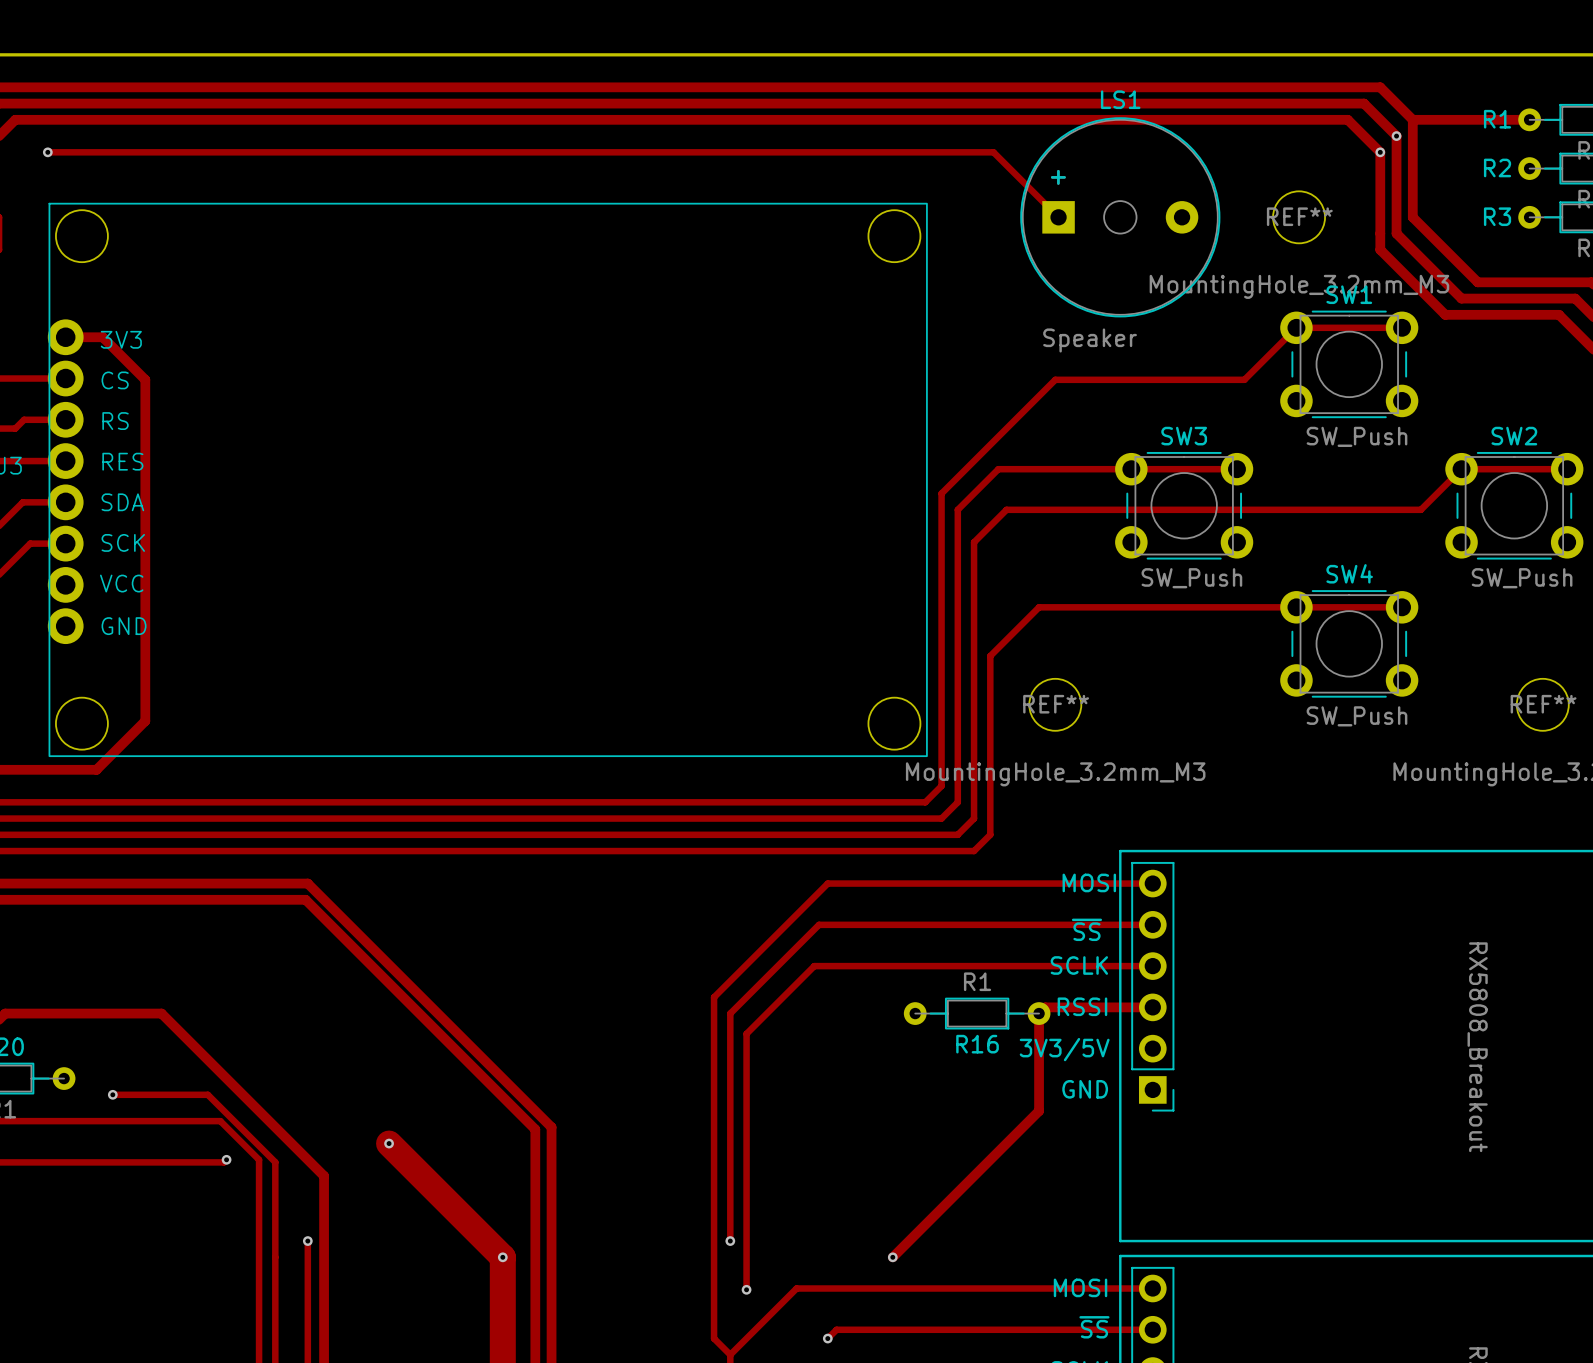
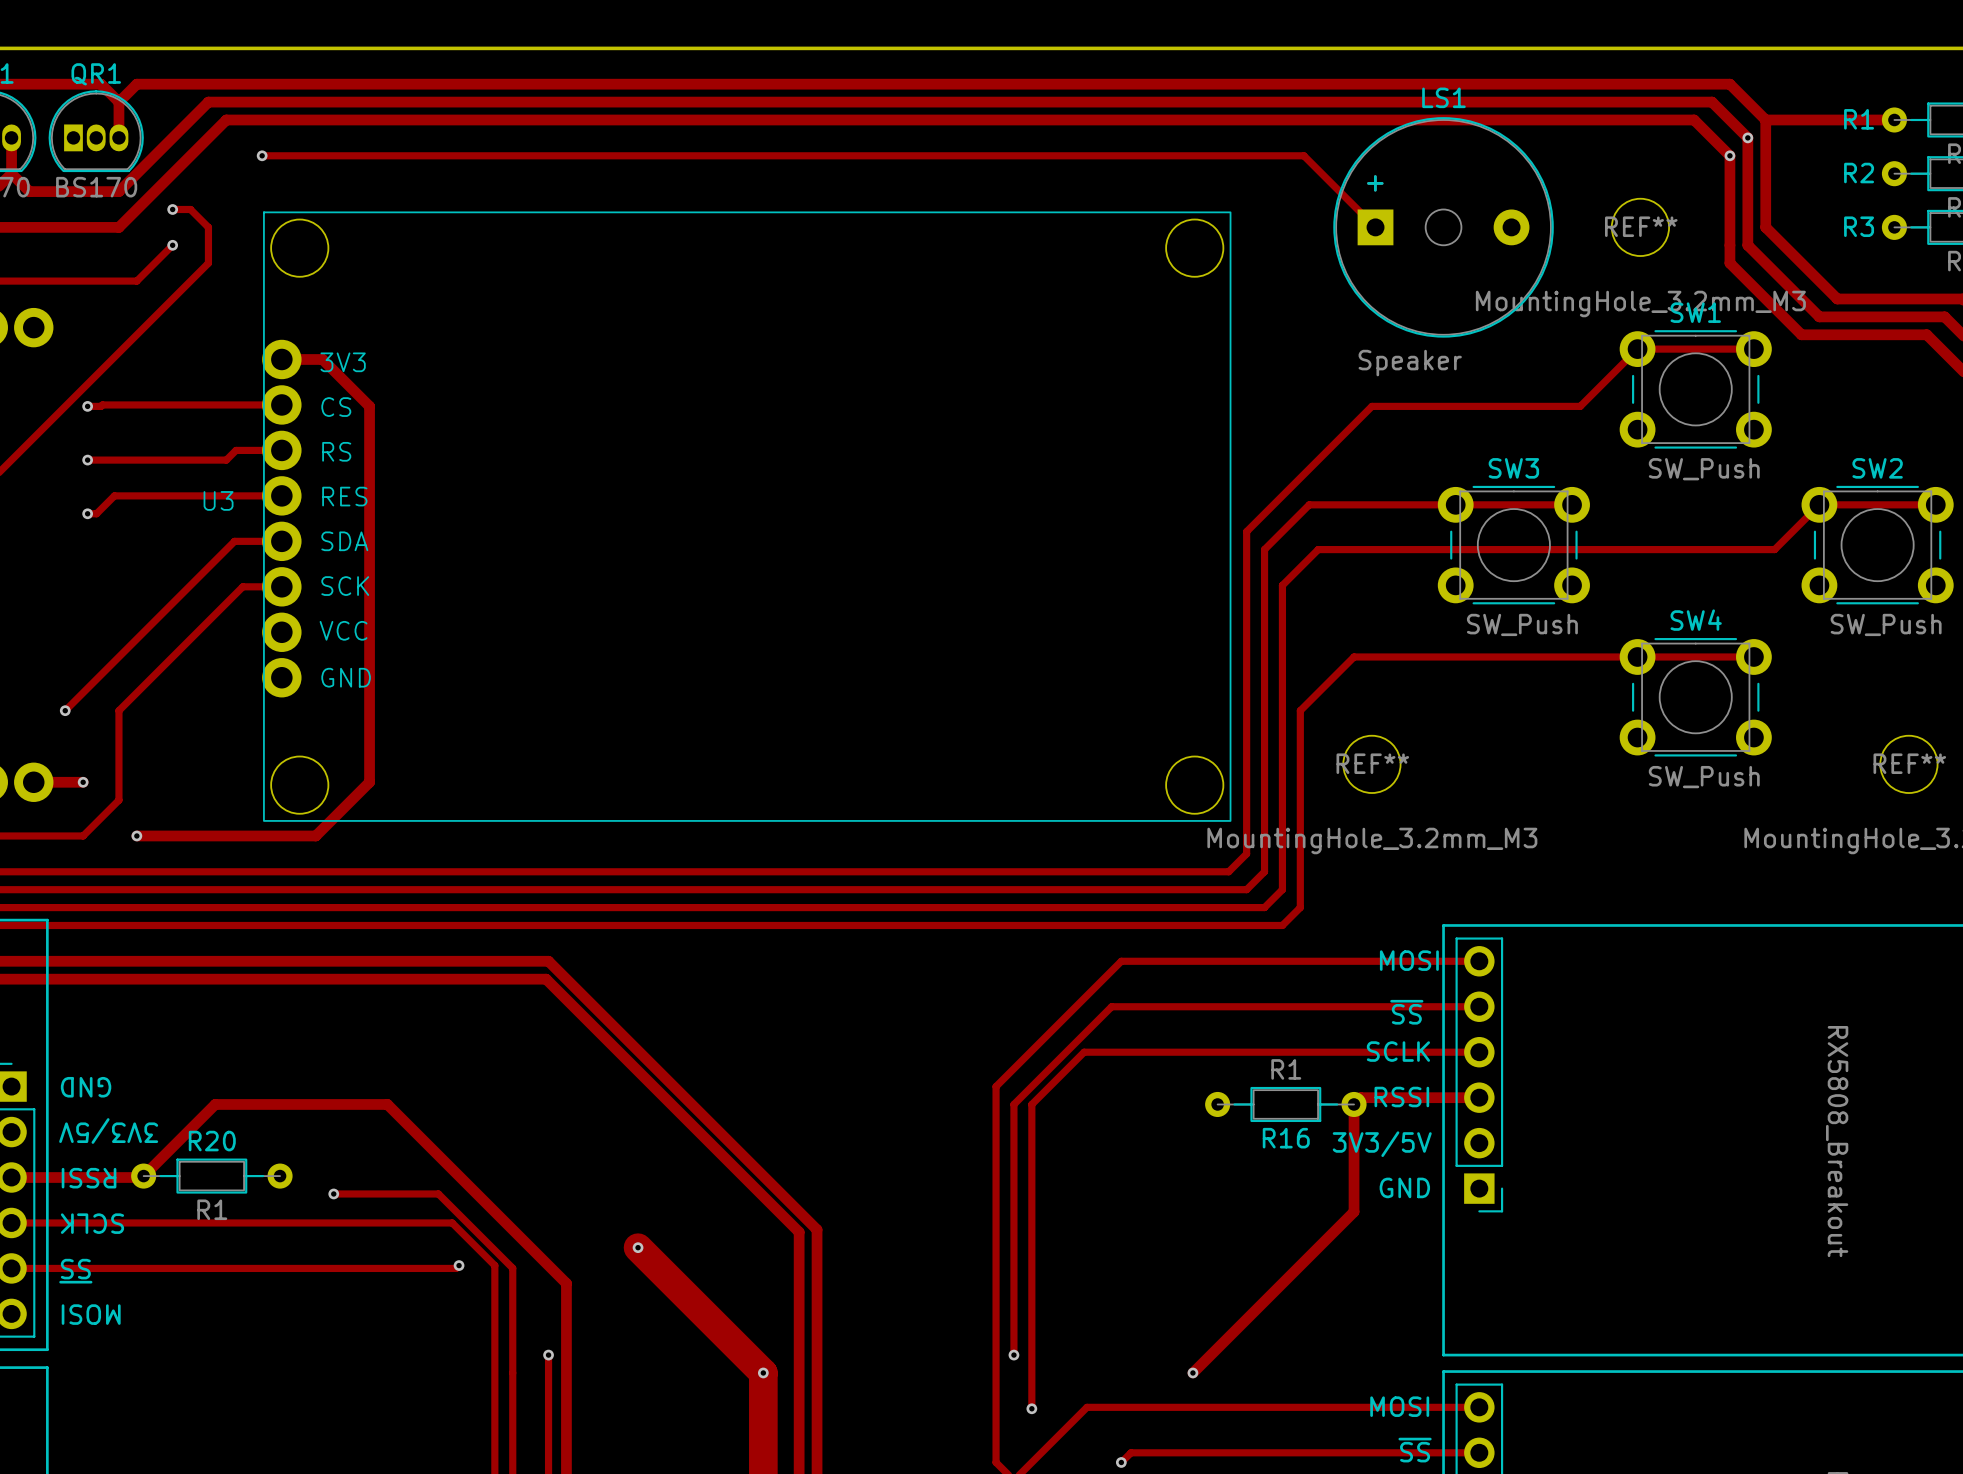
track: (814, 966) (746, 1033) -> (1106, 1052) (1084, 1052) (1031, 1104) (1031, 1126)

